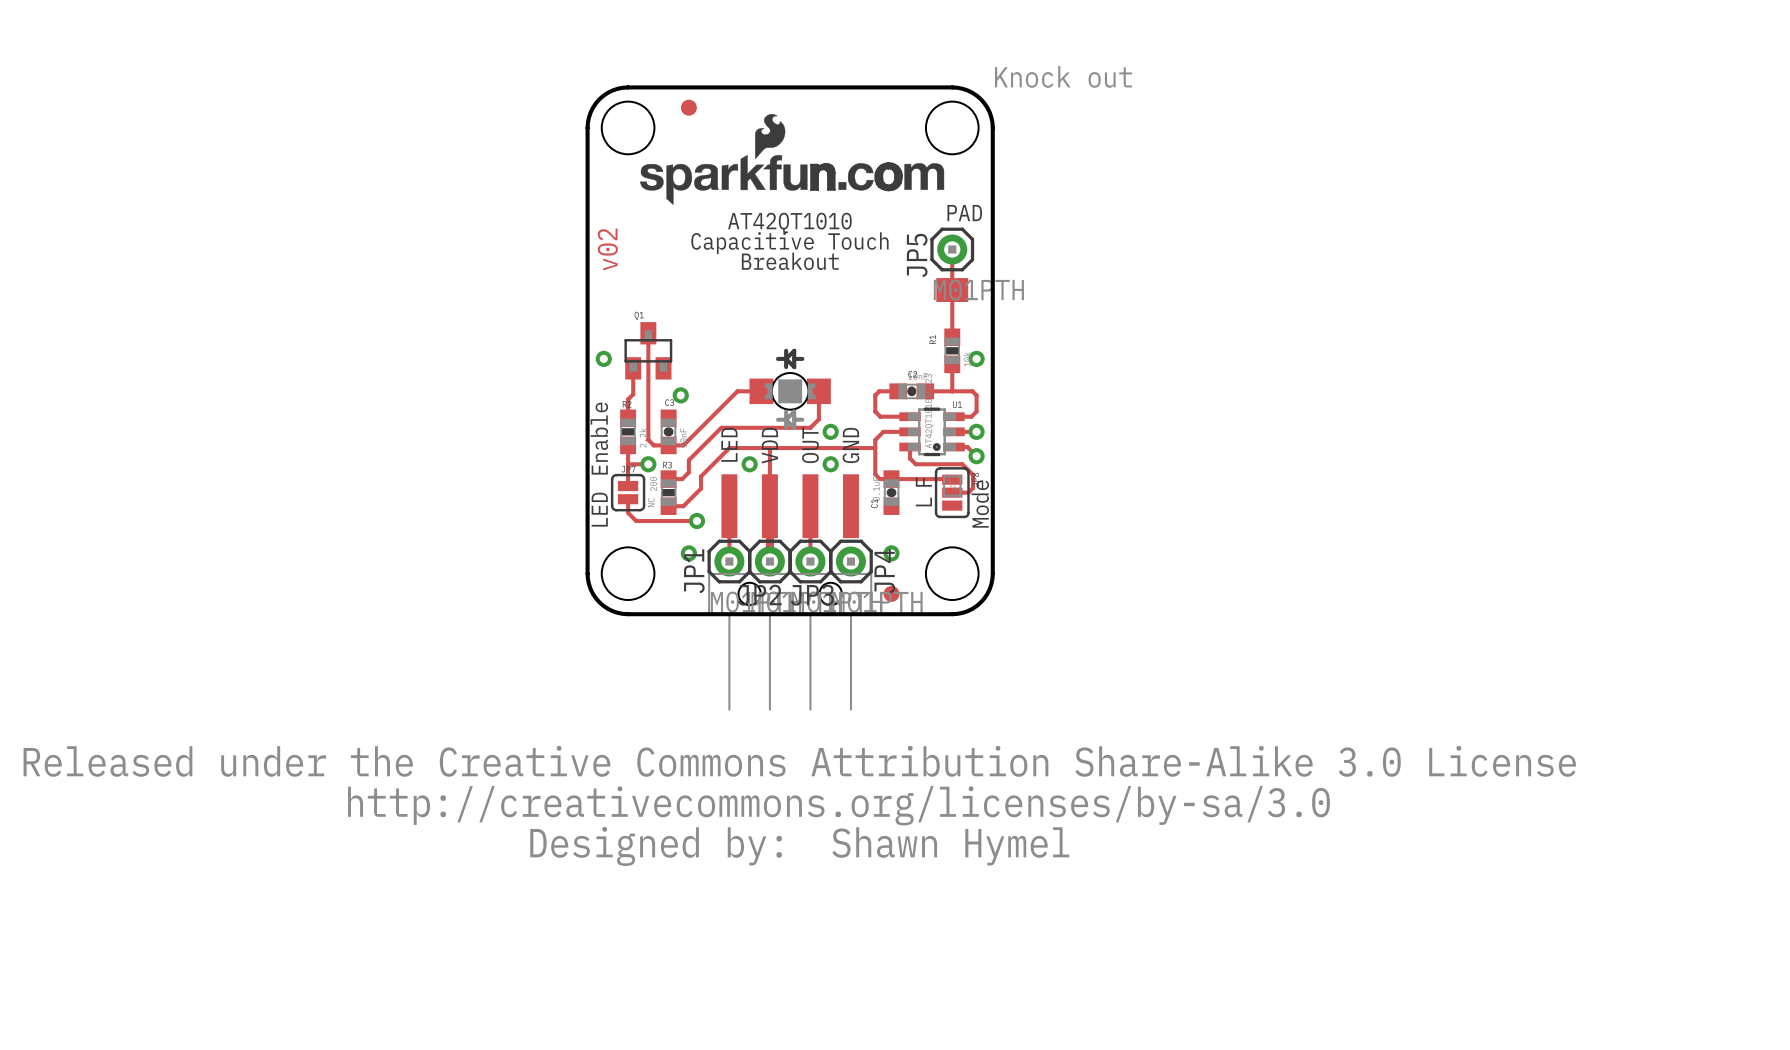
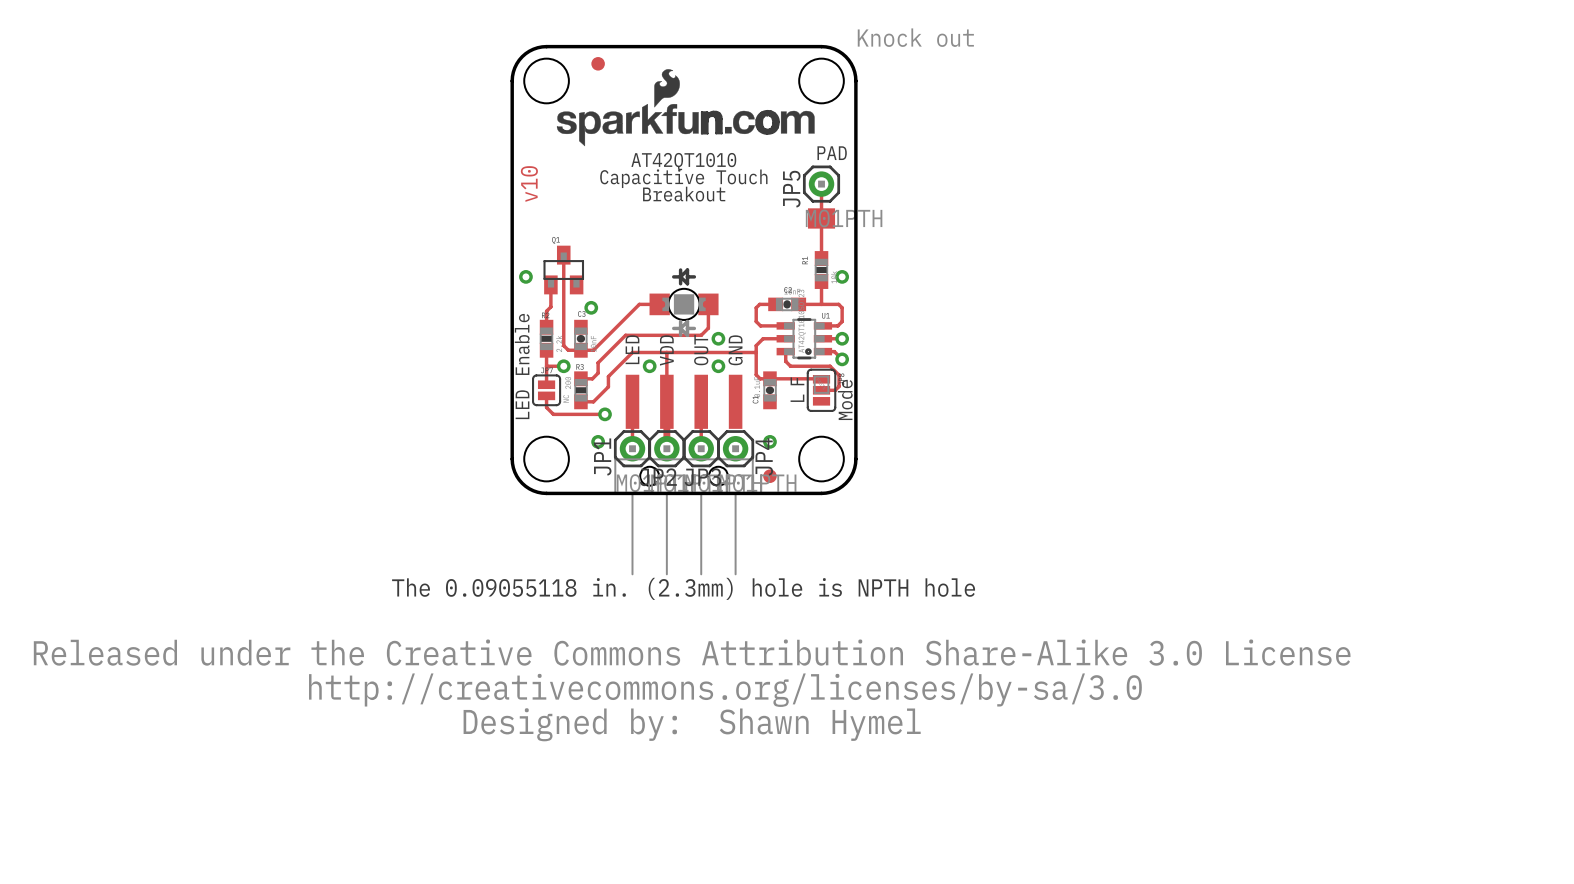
text: v02 (607, 249) -> v10 (529, 184)
text: none -> The 0.09055118 in. (2.3mm) hole is NPTH hole (683, 588)
drawing position: (799, 805) -> (692, 690)
text position: Shawn Hymel (950, 846) -> Shawn Hymel (820, 724)

